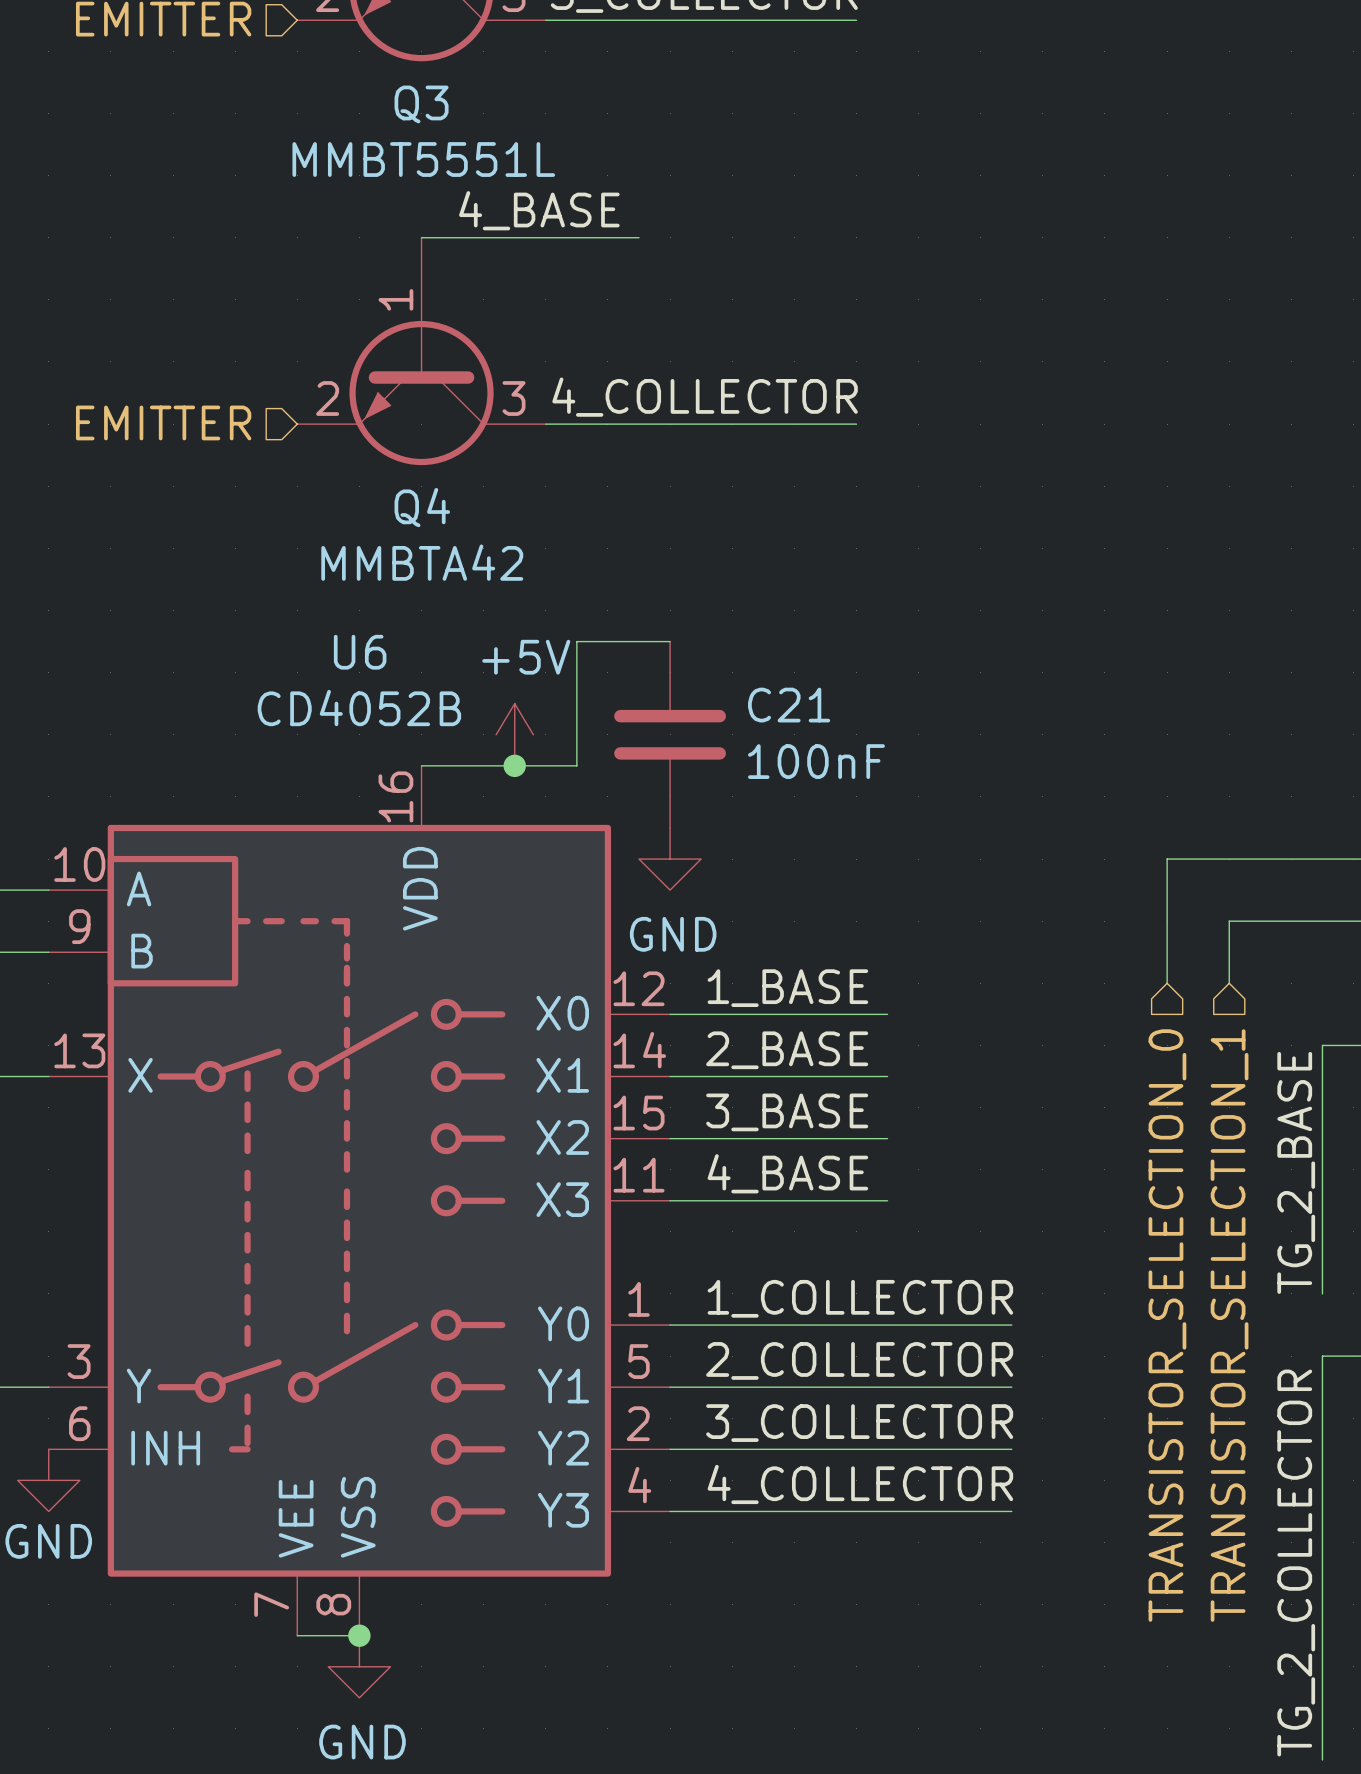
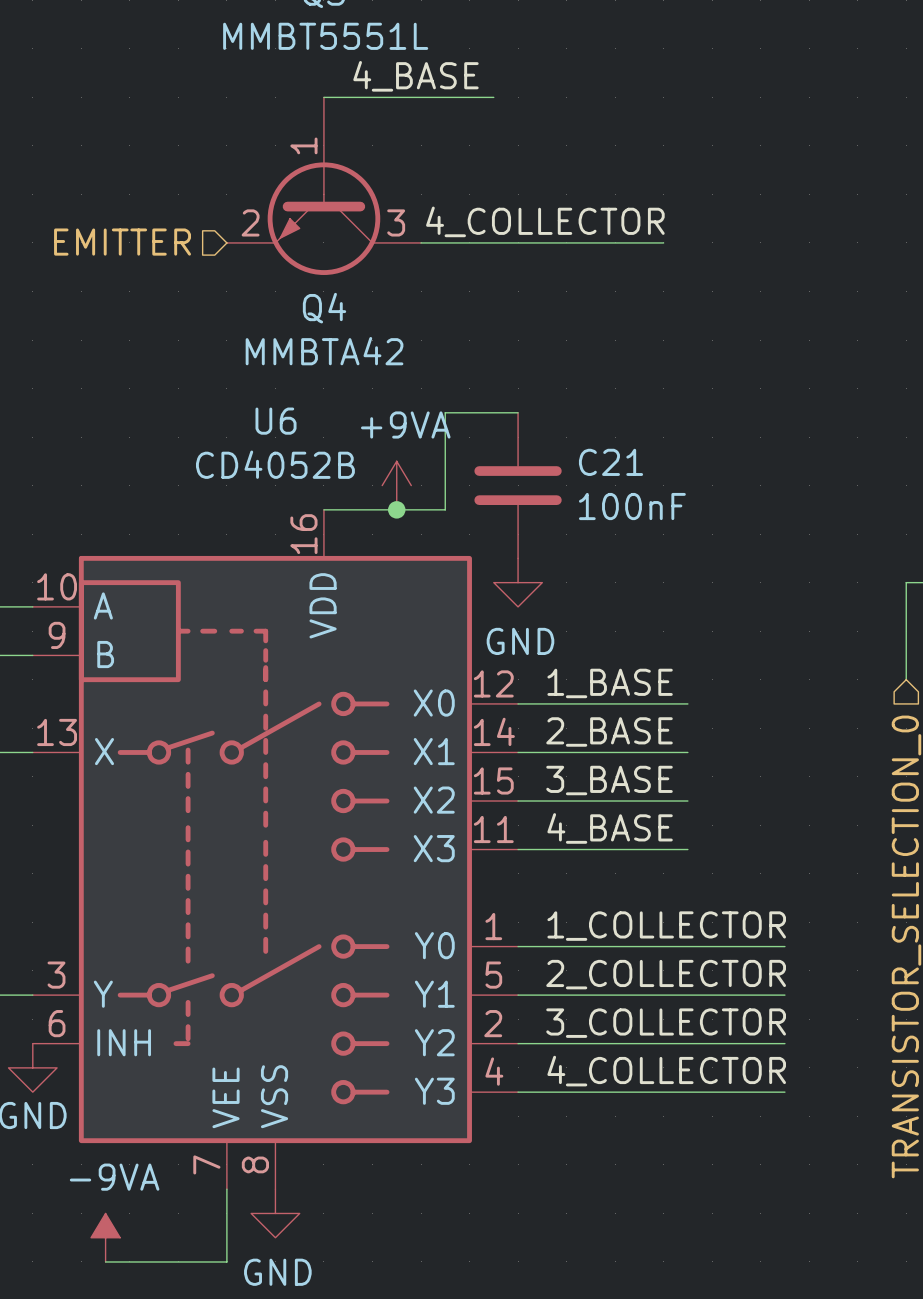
power symbol: +5V (514, 734) -> +9VA (396, 485)
wire: (297, 1635) (359, 1635) -> (226, 1189) (226, 1261) (105, 1261)
junction: (359, 1635) -> none
power symbol: none -> -9VA (105, 1237)

